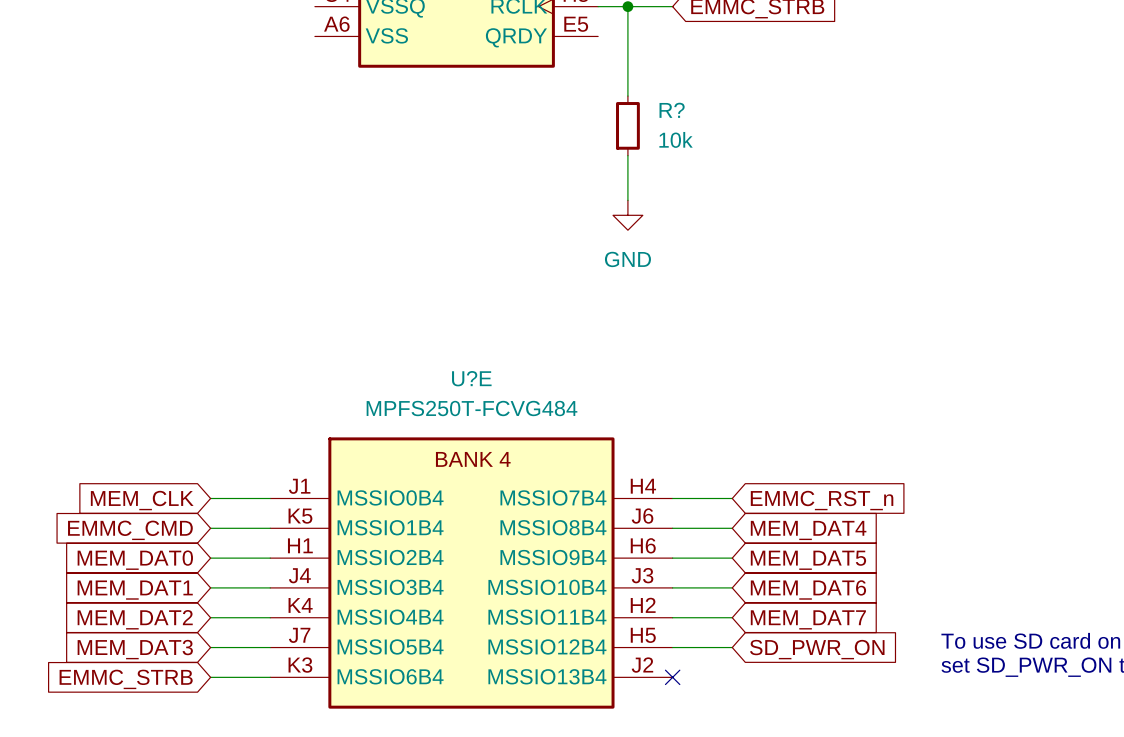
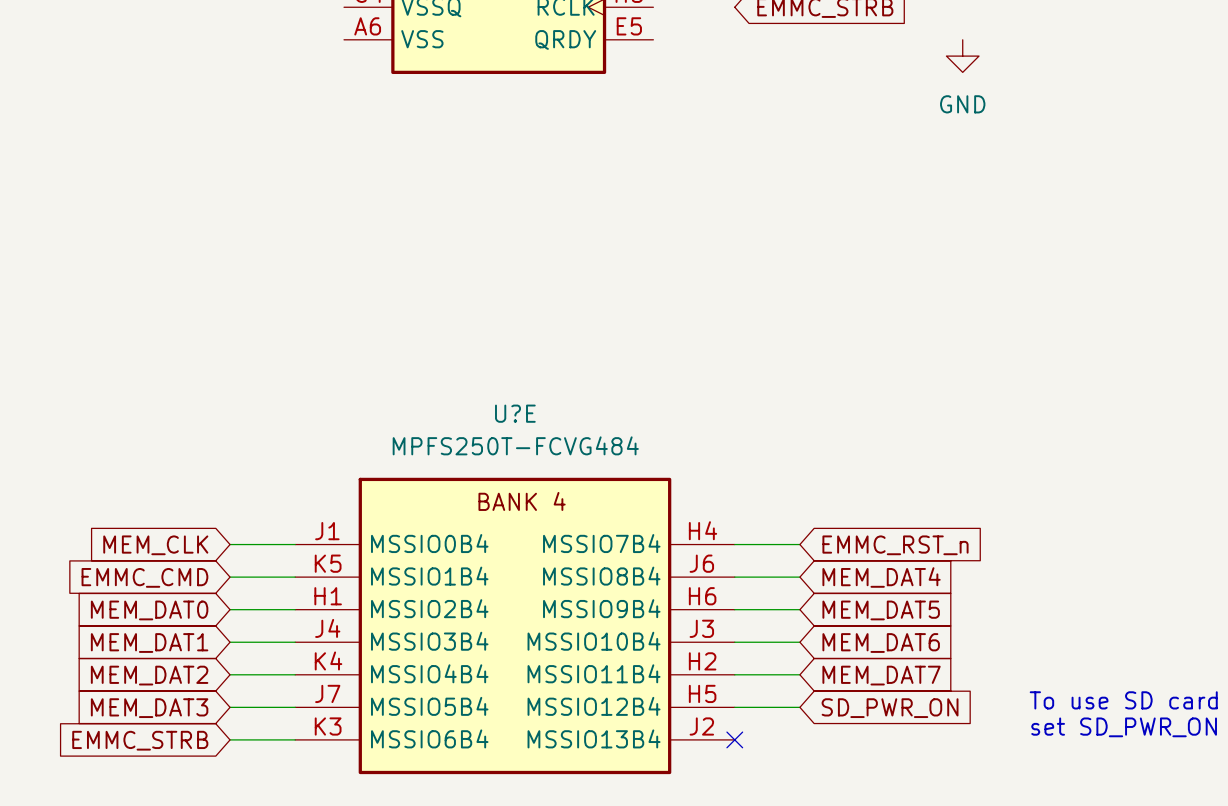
wire: (598, 6) (672, 6) -> none
wire: (627, 6) (627, 96) -> none
junction: (627, 6) -> none
power symbol: none -> GND (962, 56)
R?: (627, 125) -> none
wire: (627, 155) (627, 200) -> none
power symbol: GND (627, 215) -> none

